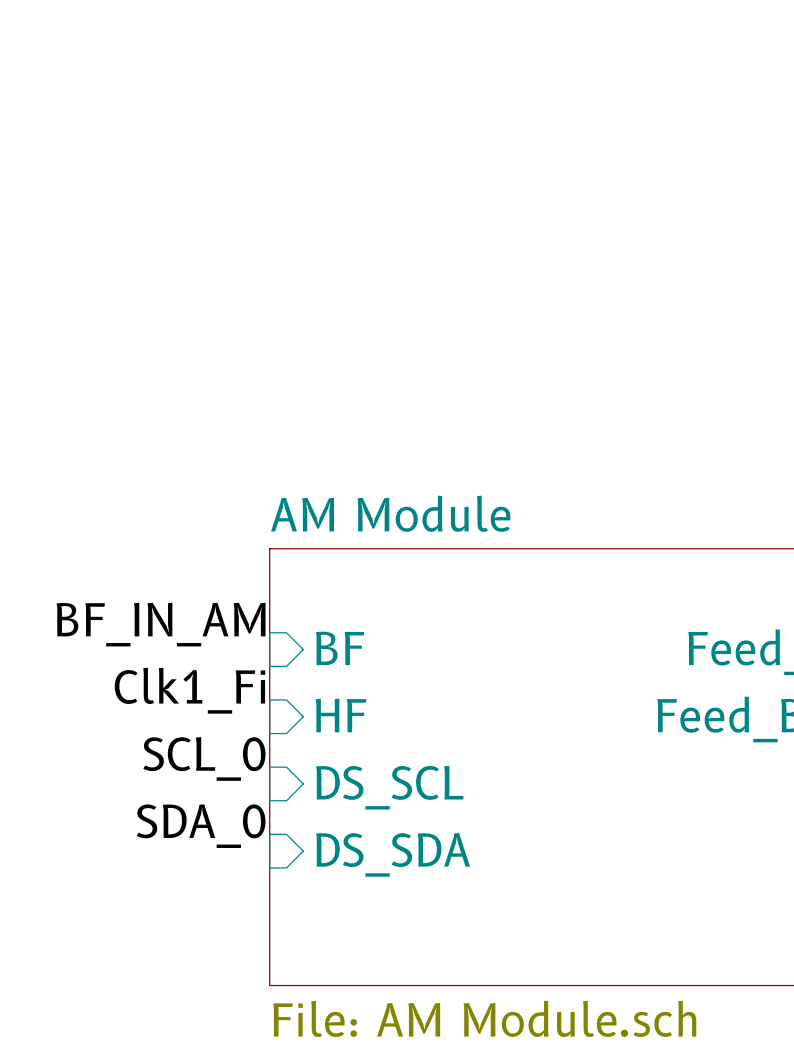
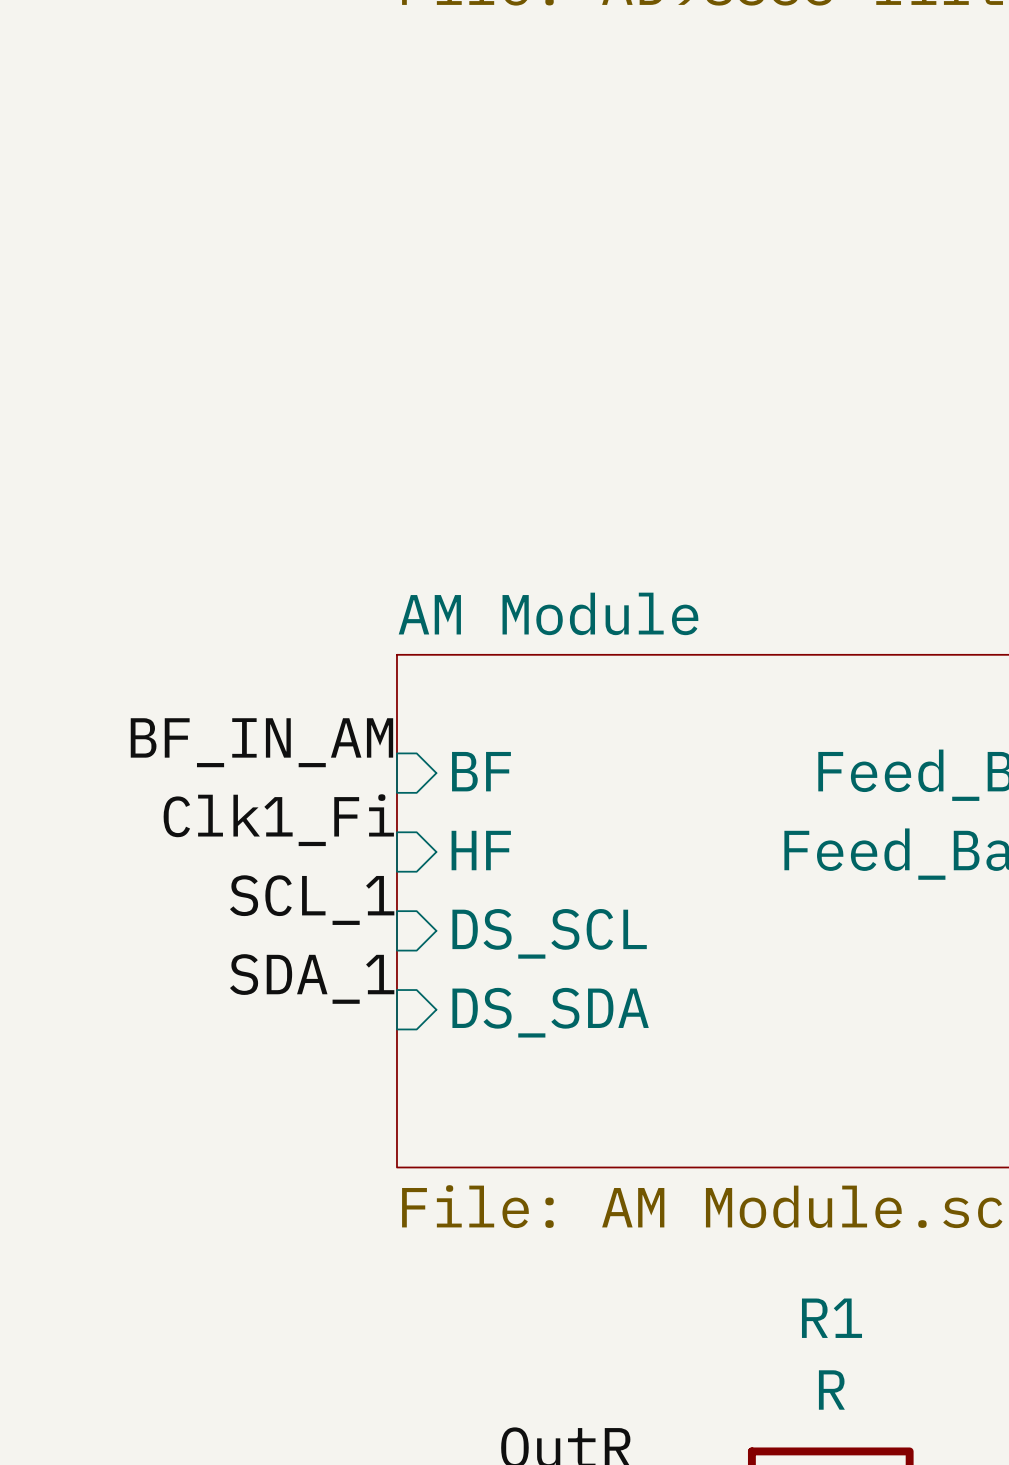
label: SCL_0 (204, 758) -> SCL_1 (312, 900)
label: SDA_0 (201, 826) -> SDA_1 (312, 978)

